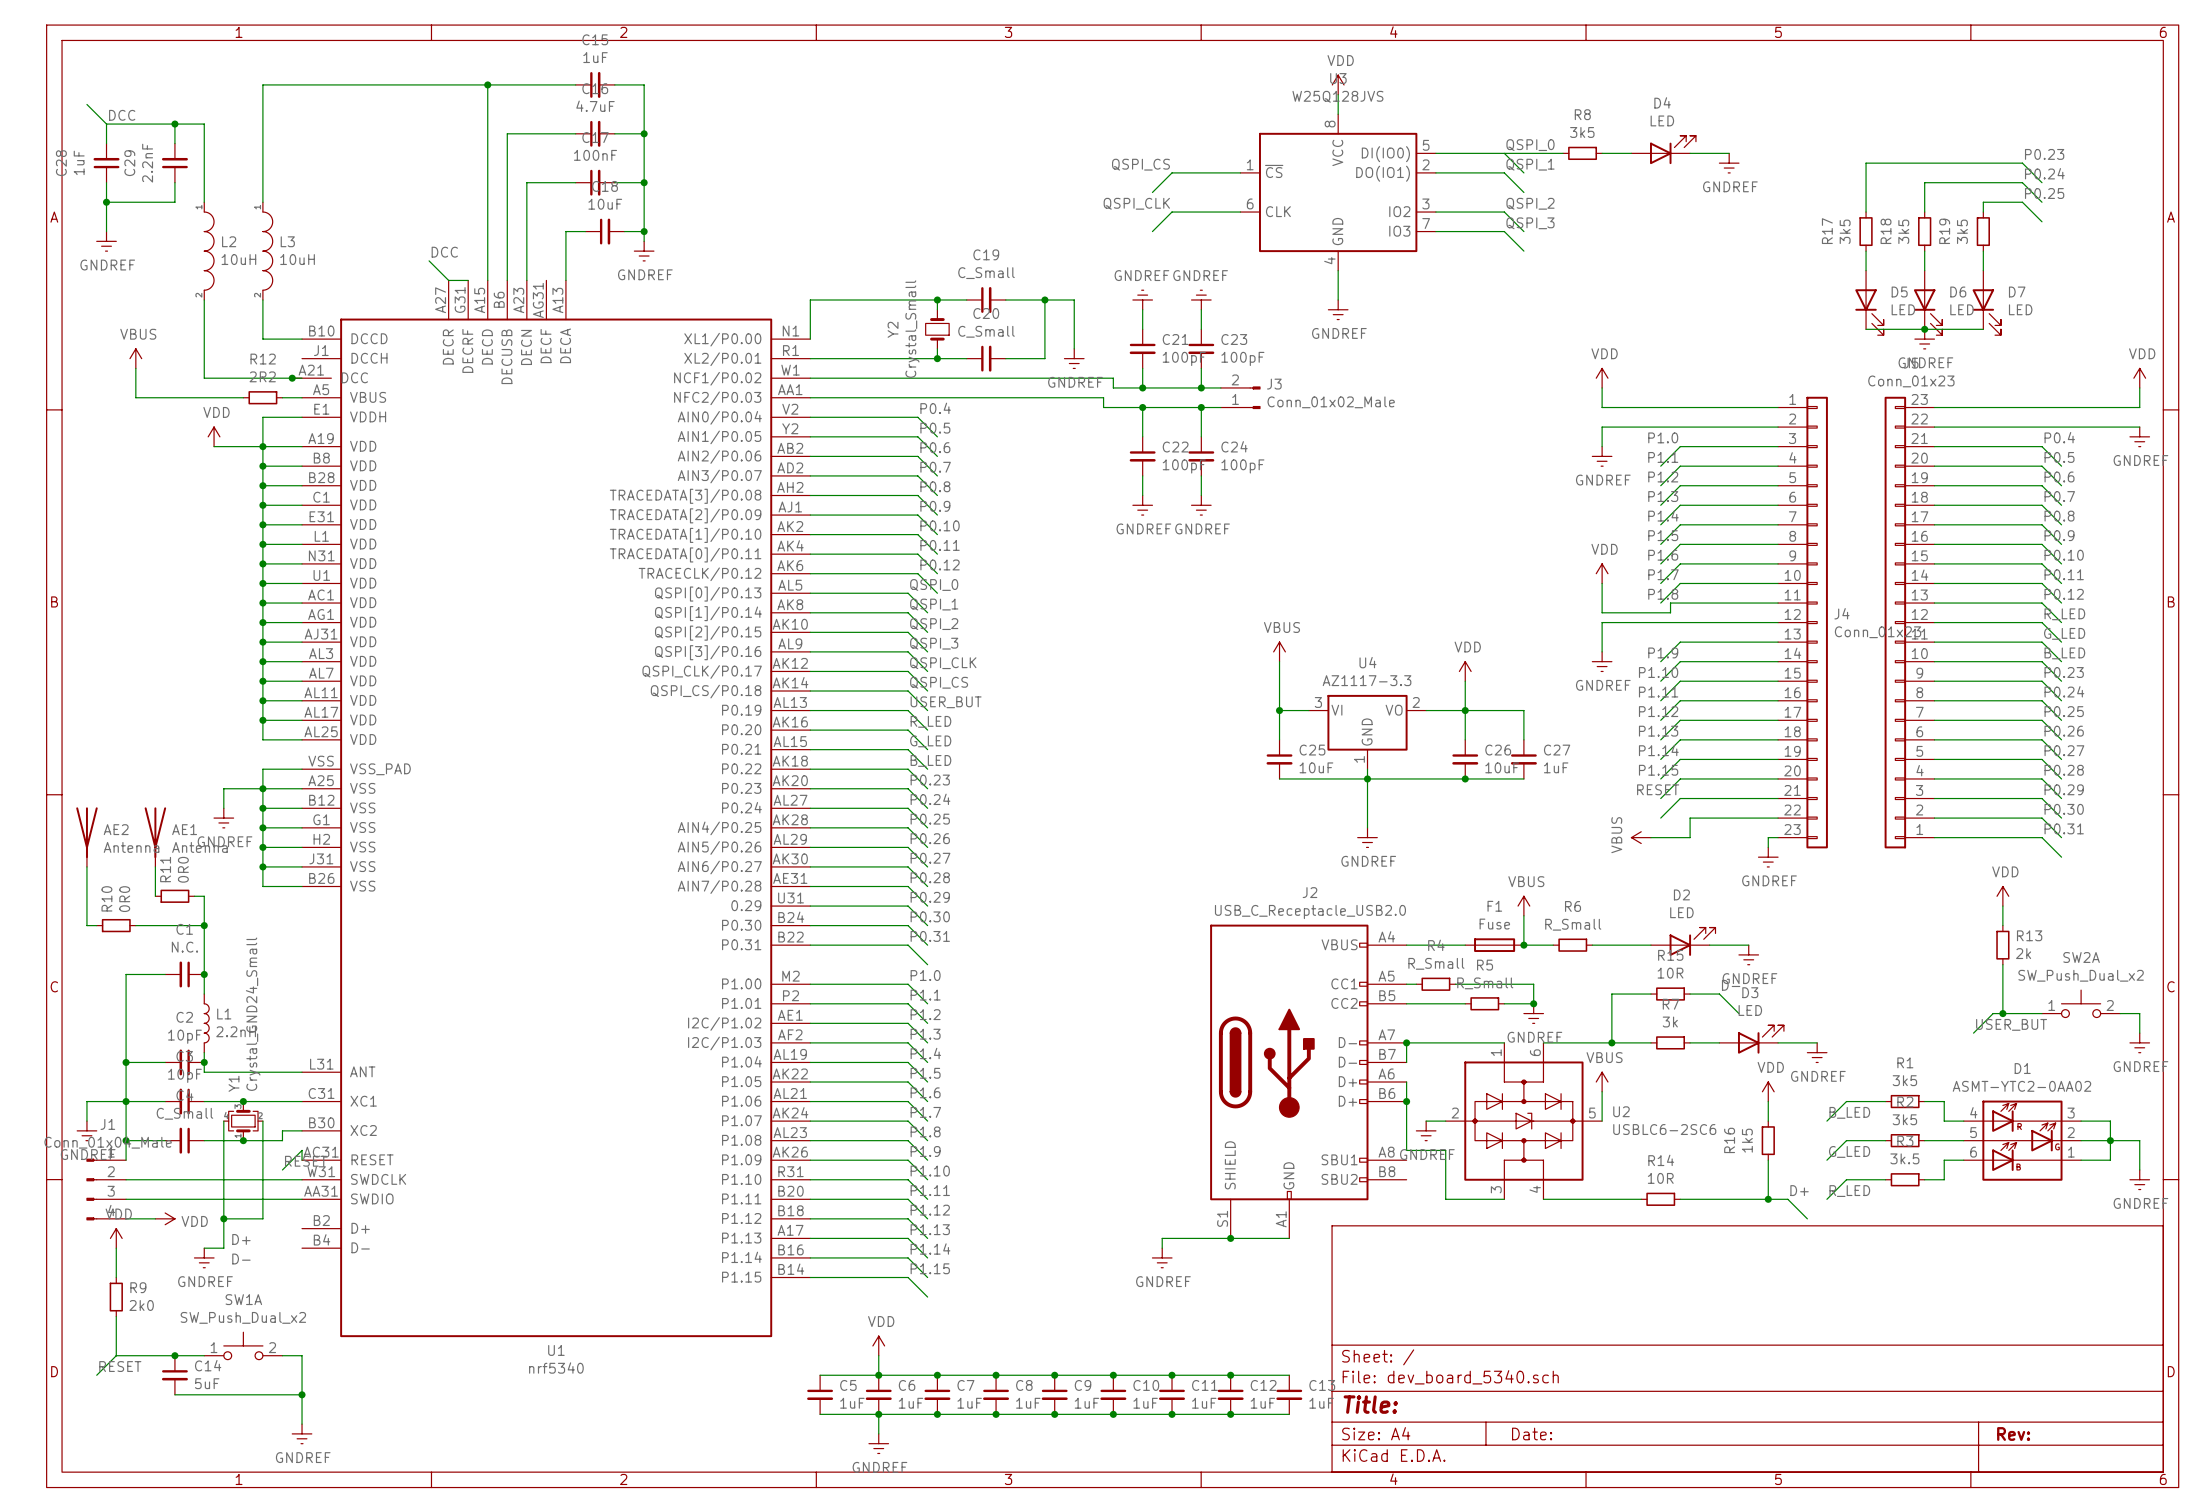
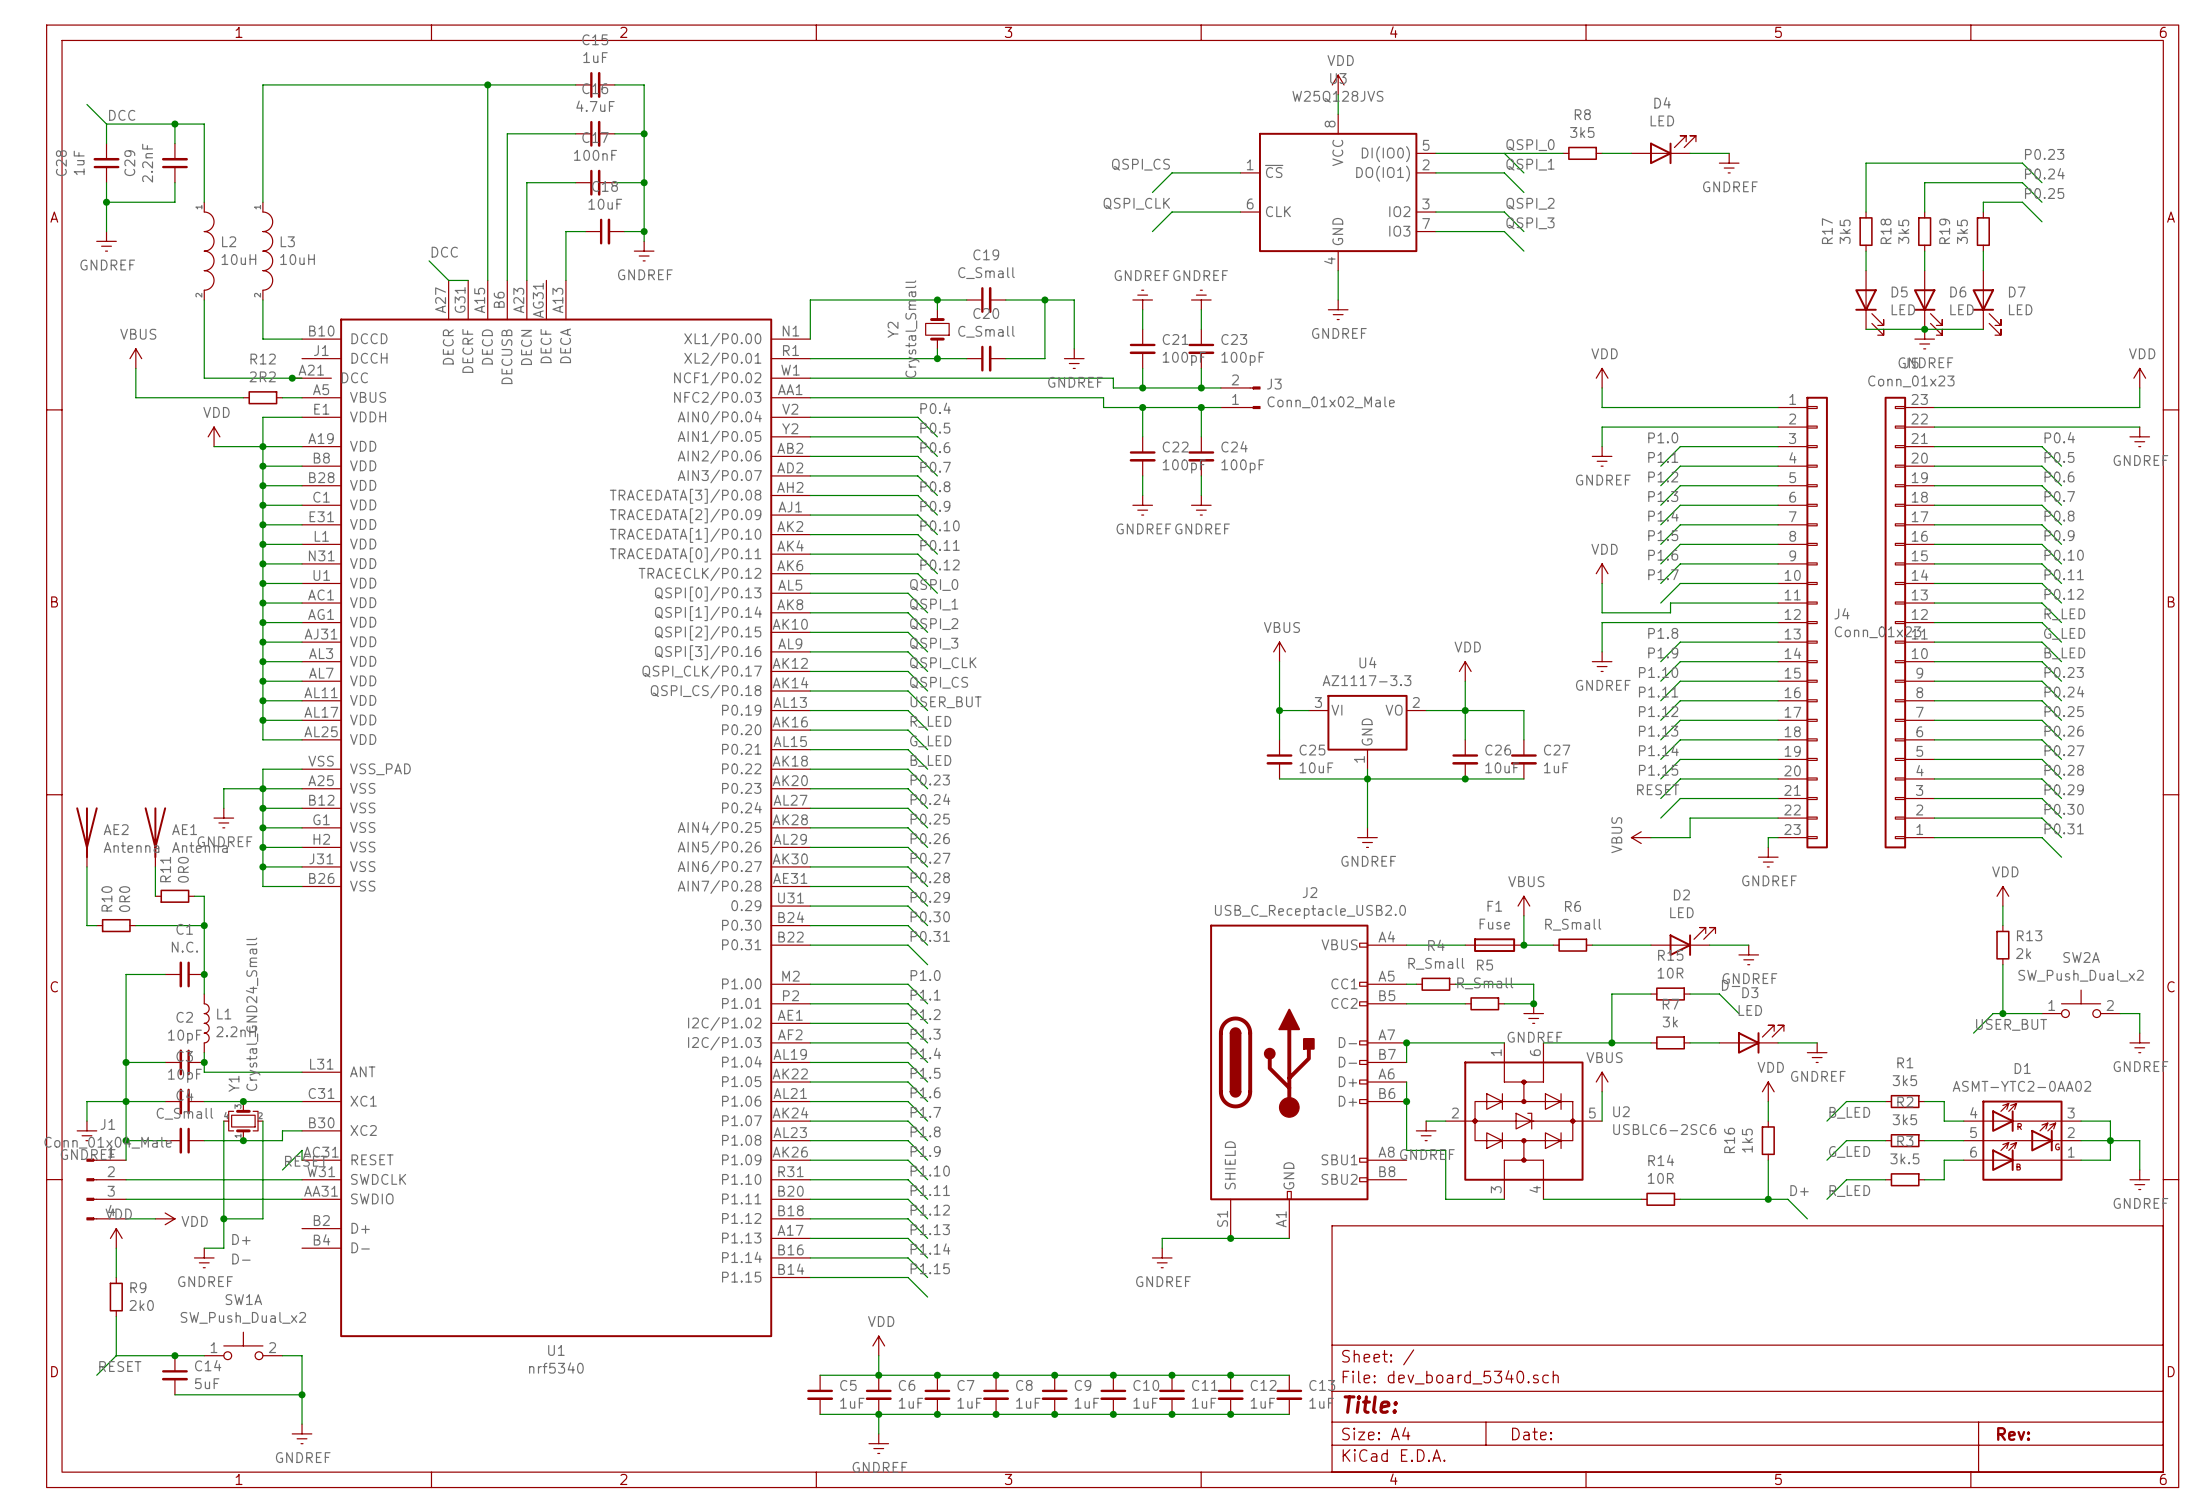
label position: P1.8 (1663, 594) -> P1.8 (1663, 633)

